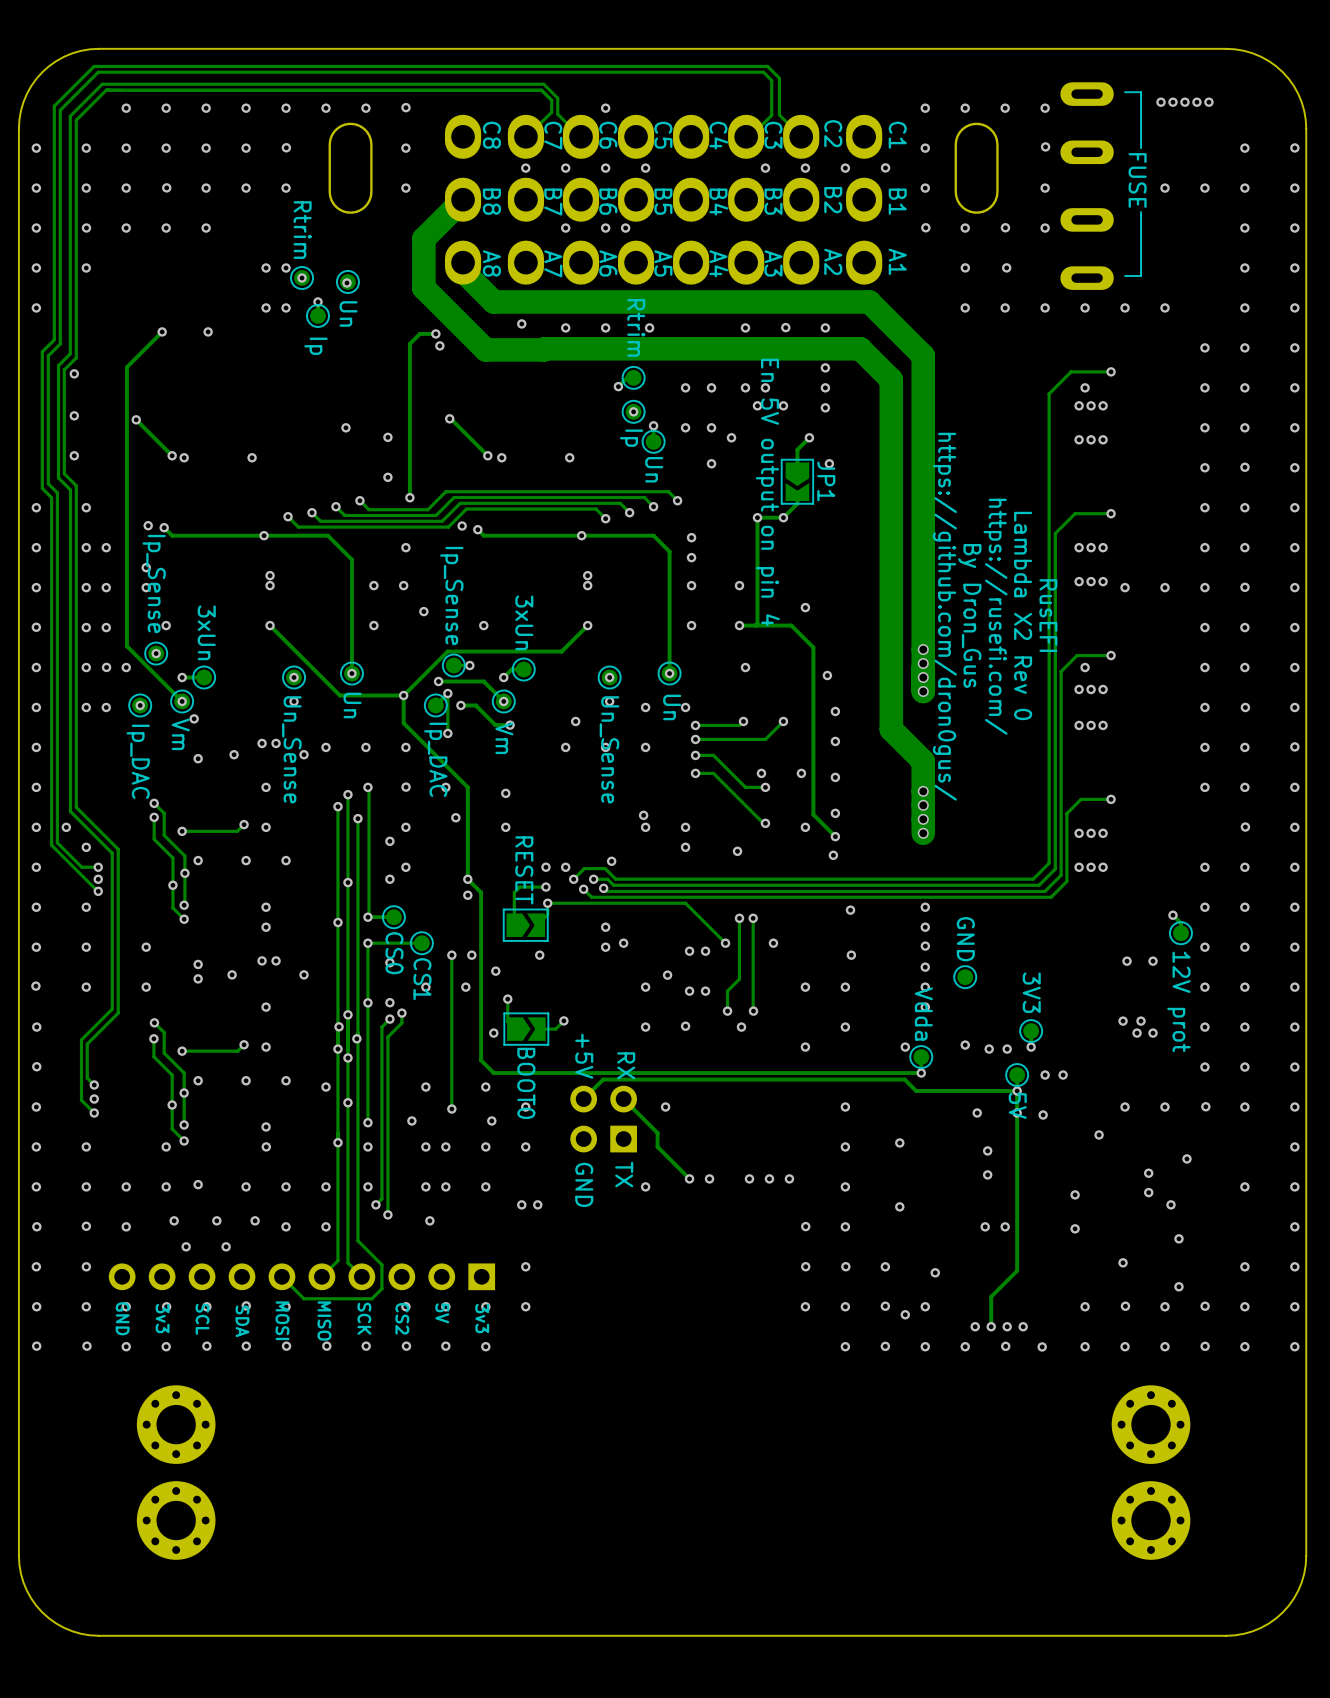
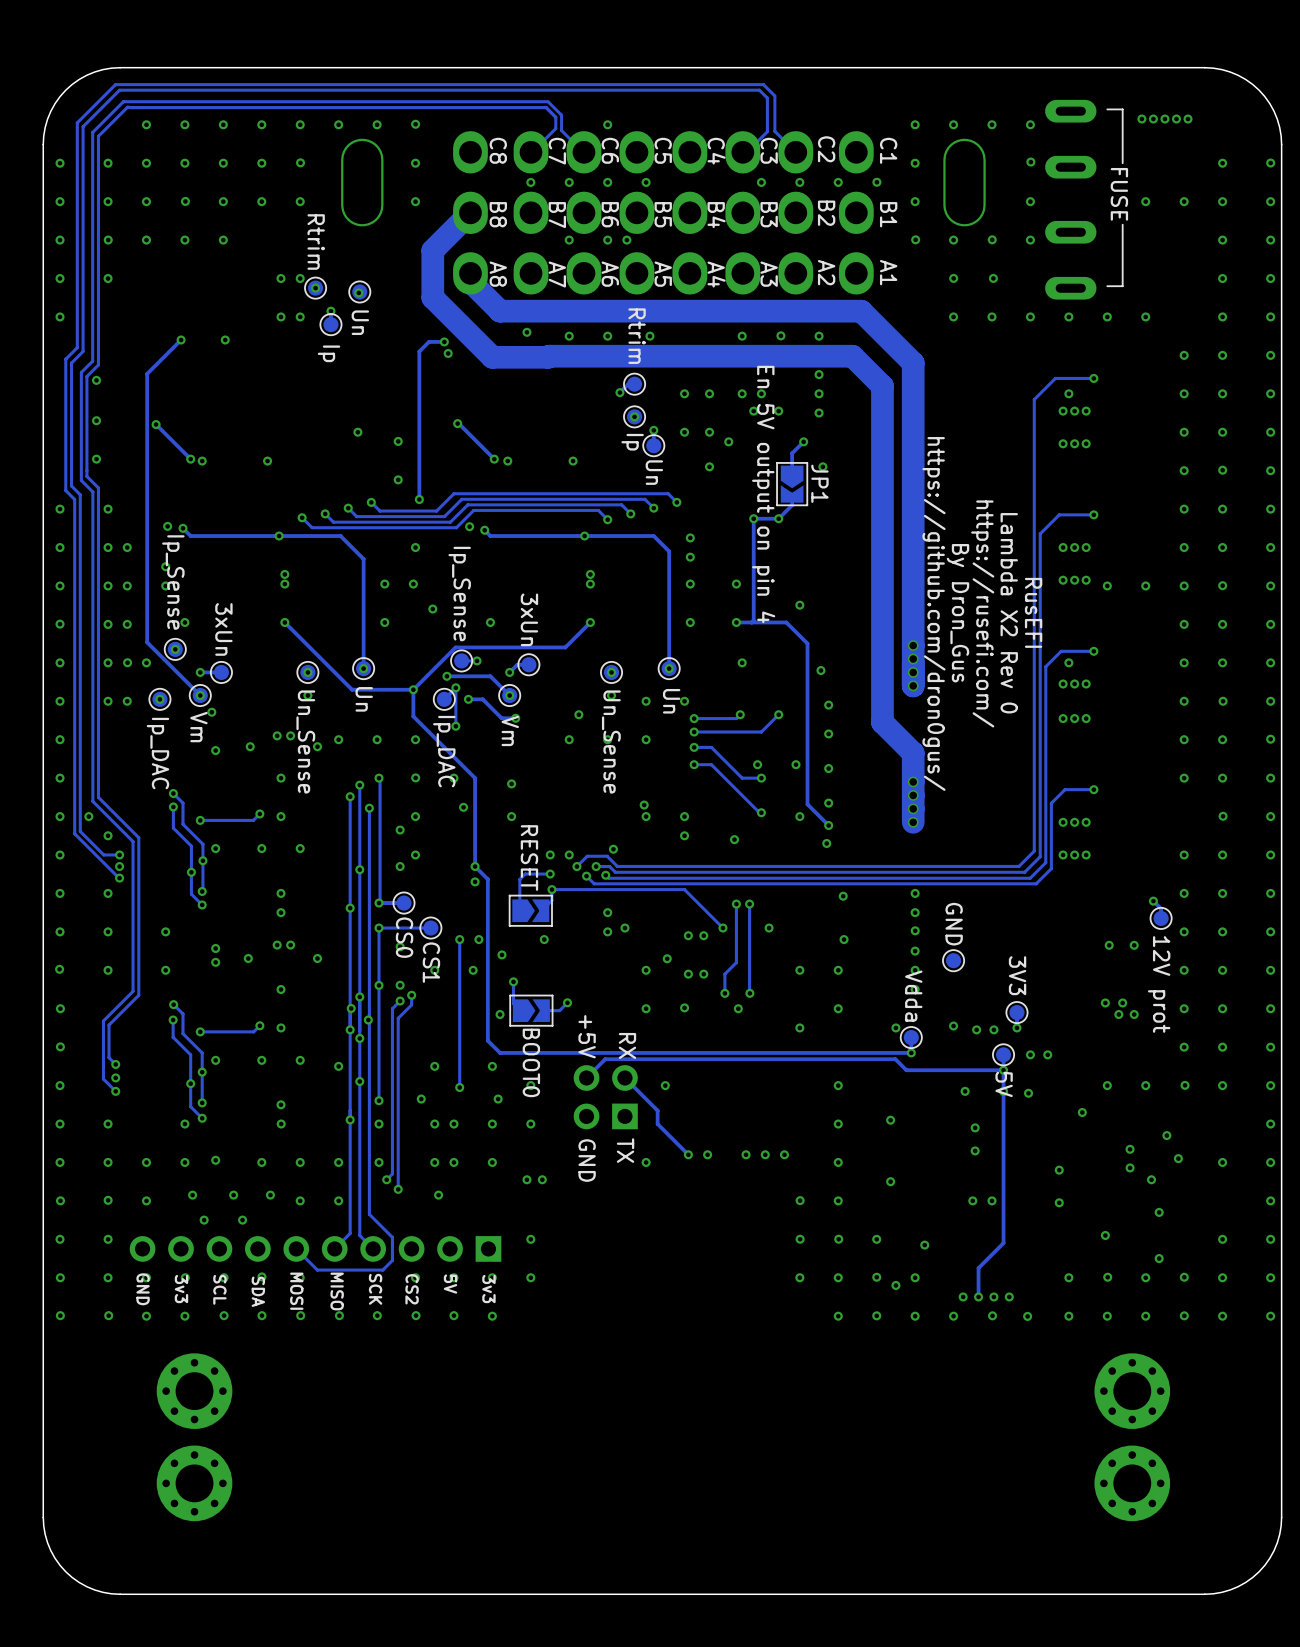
via: none -> (1178, 1158)

